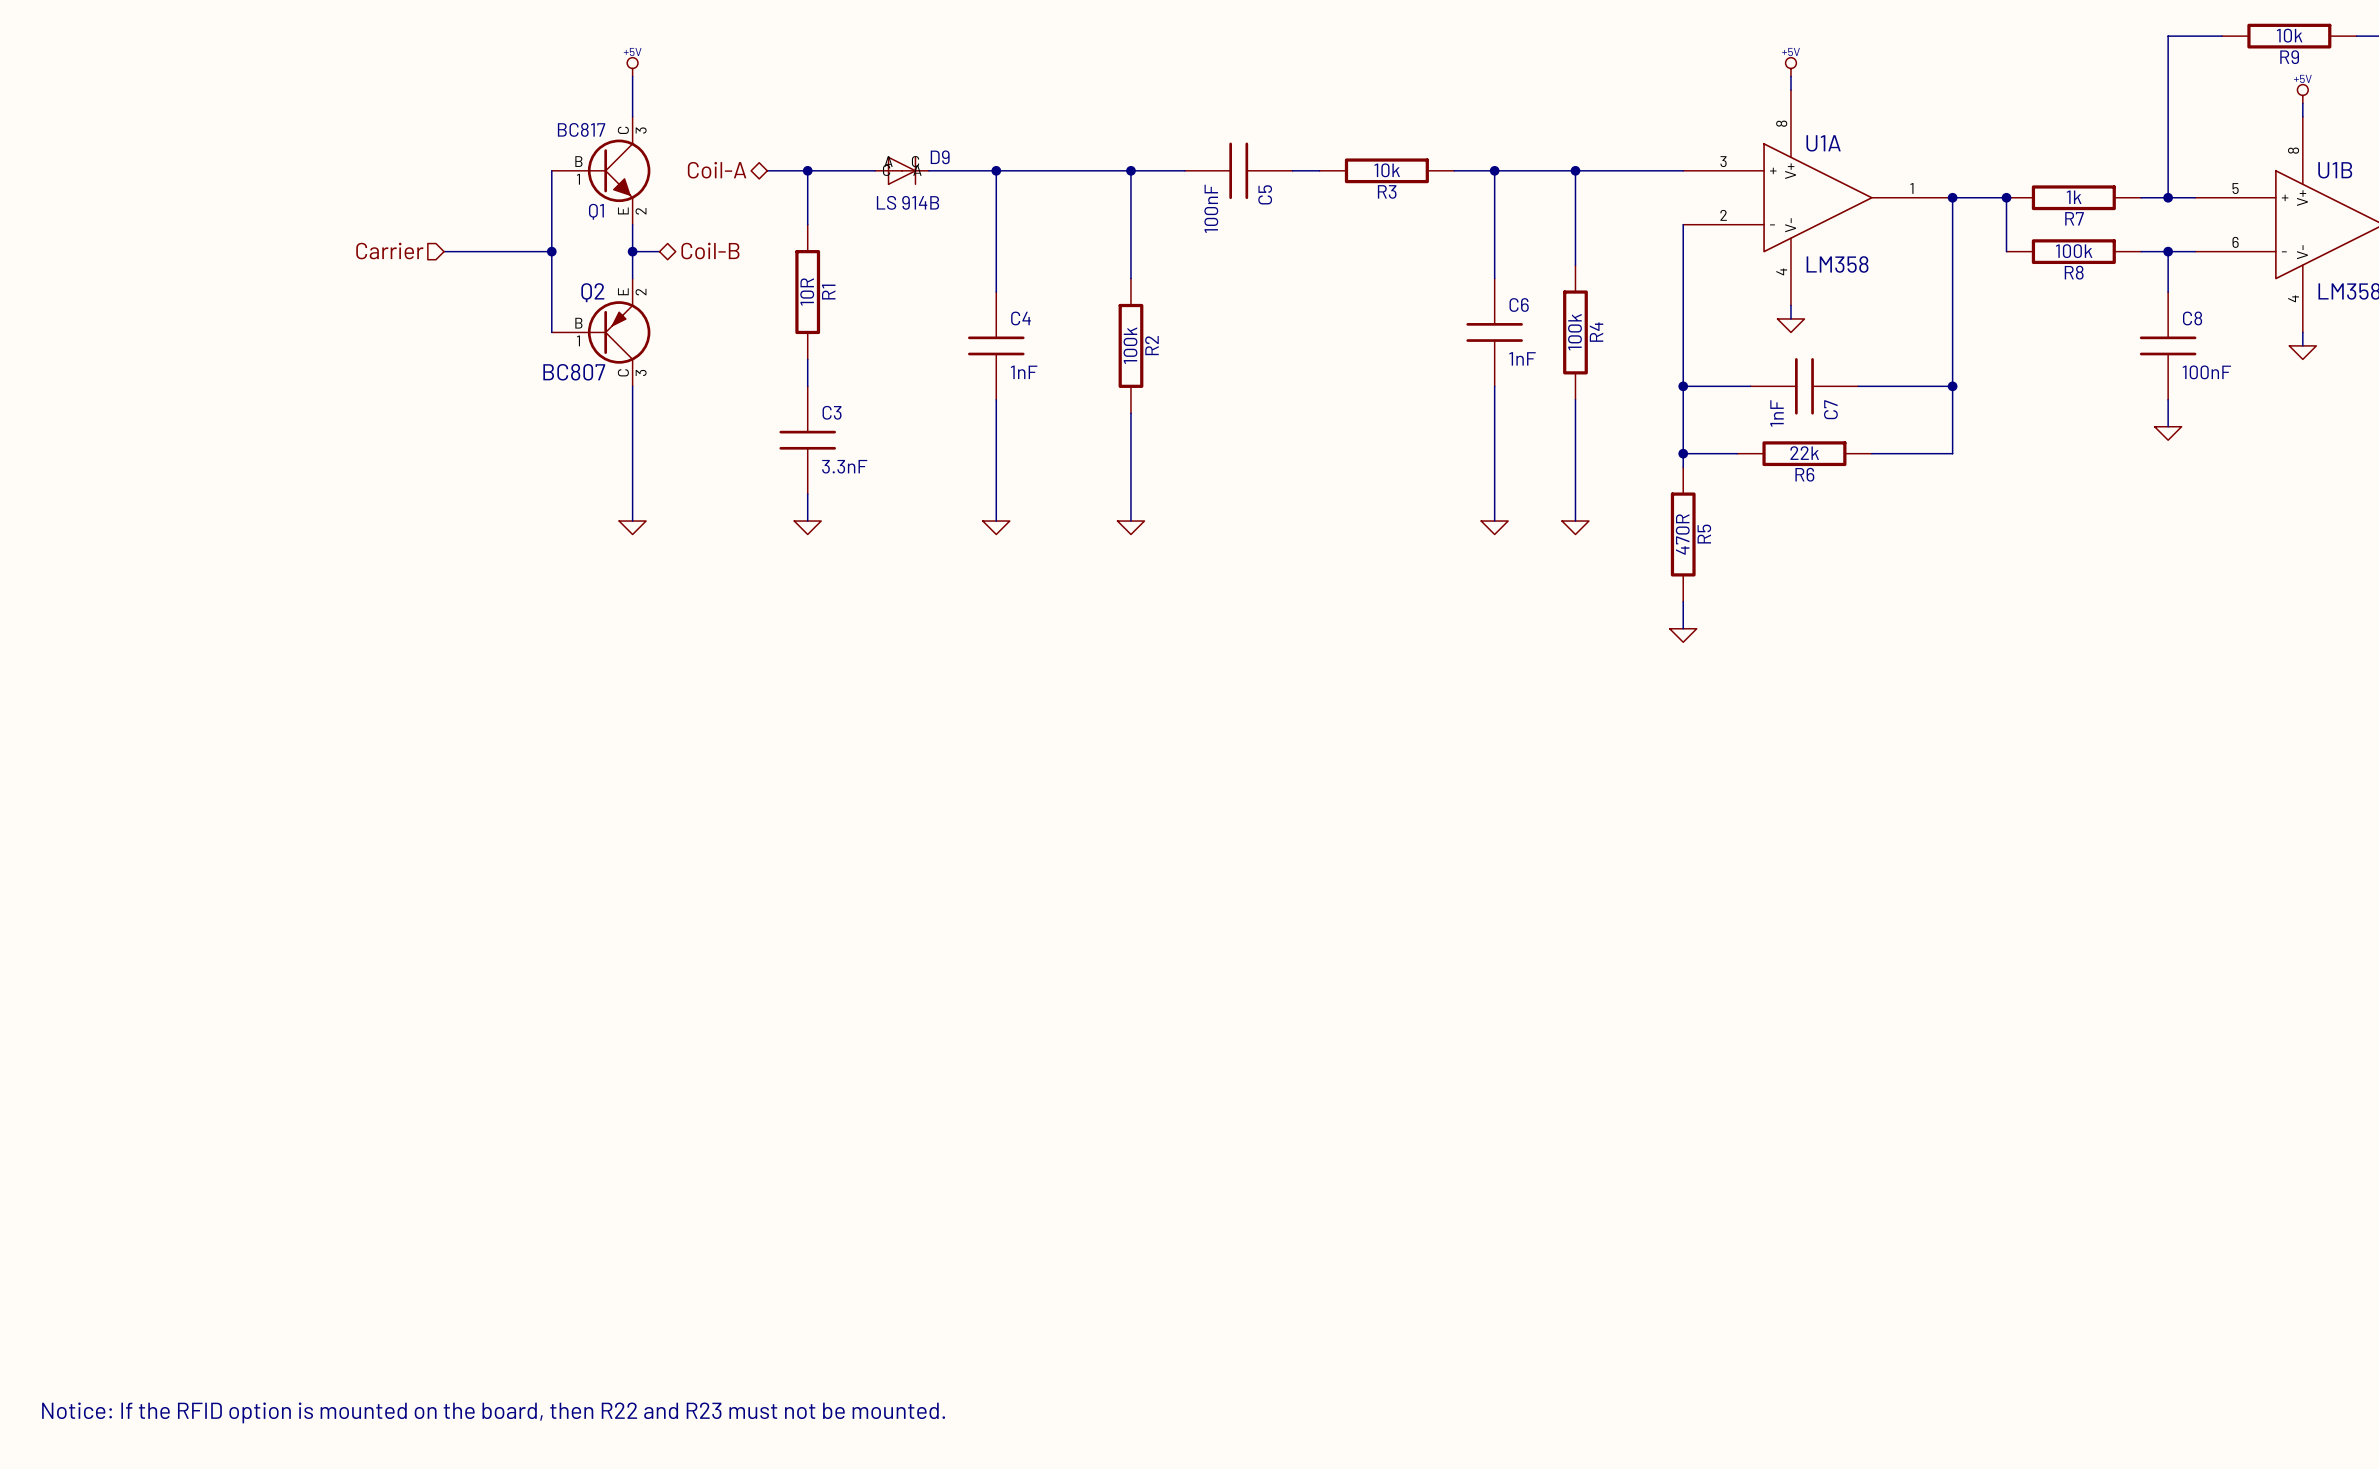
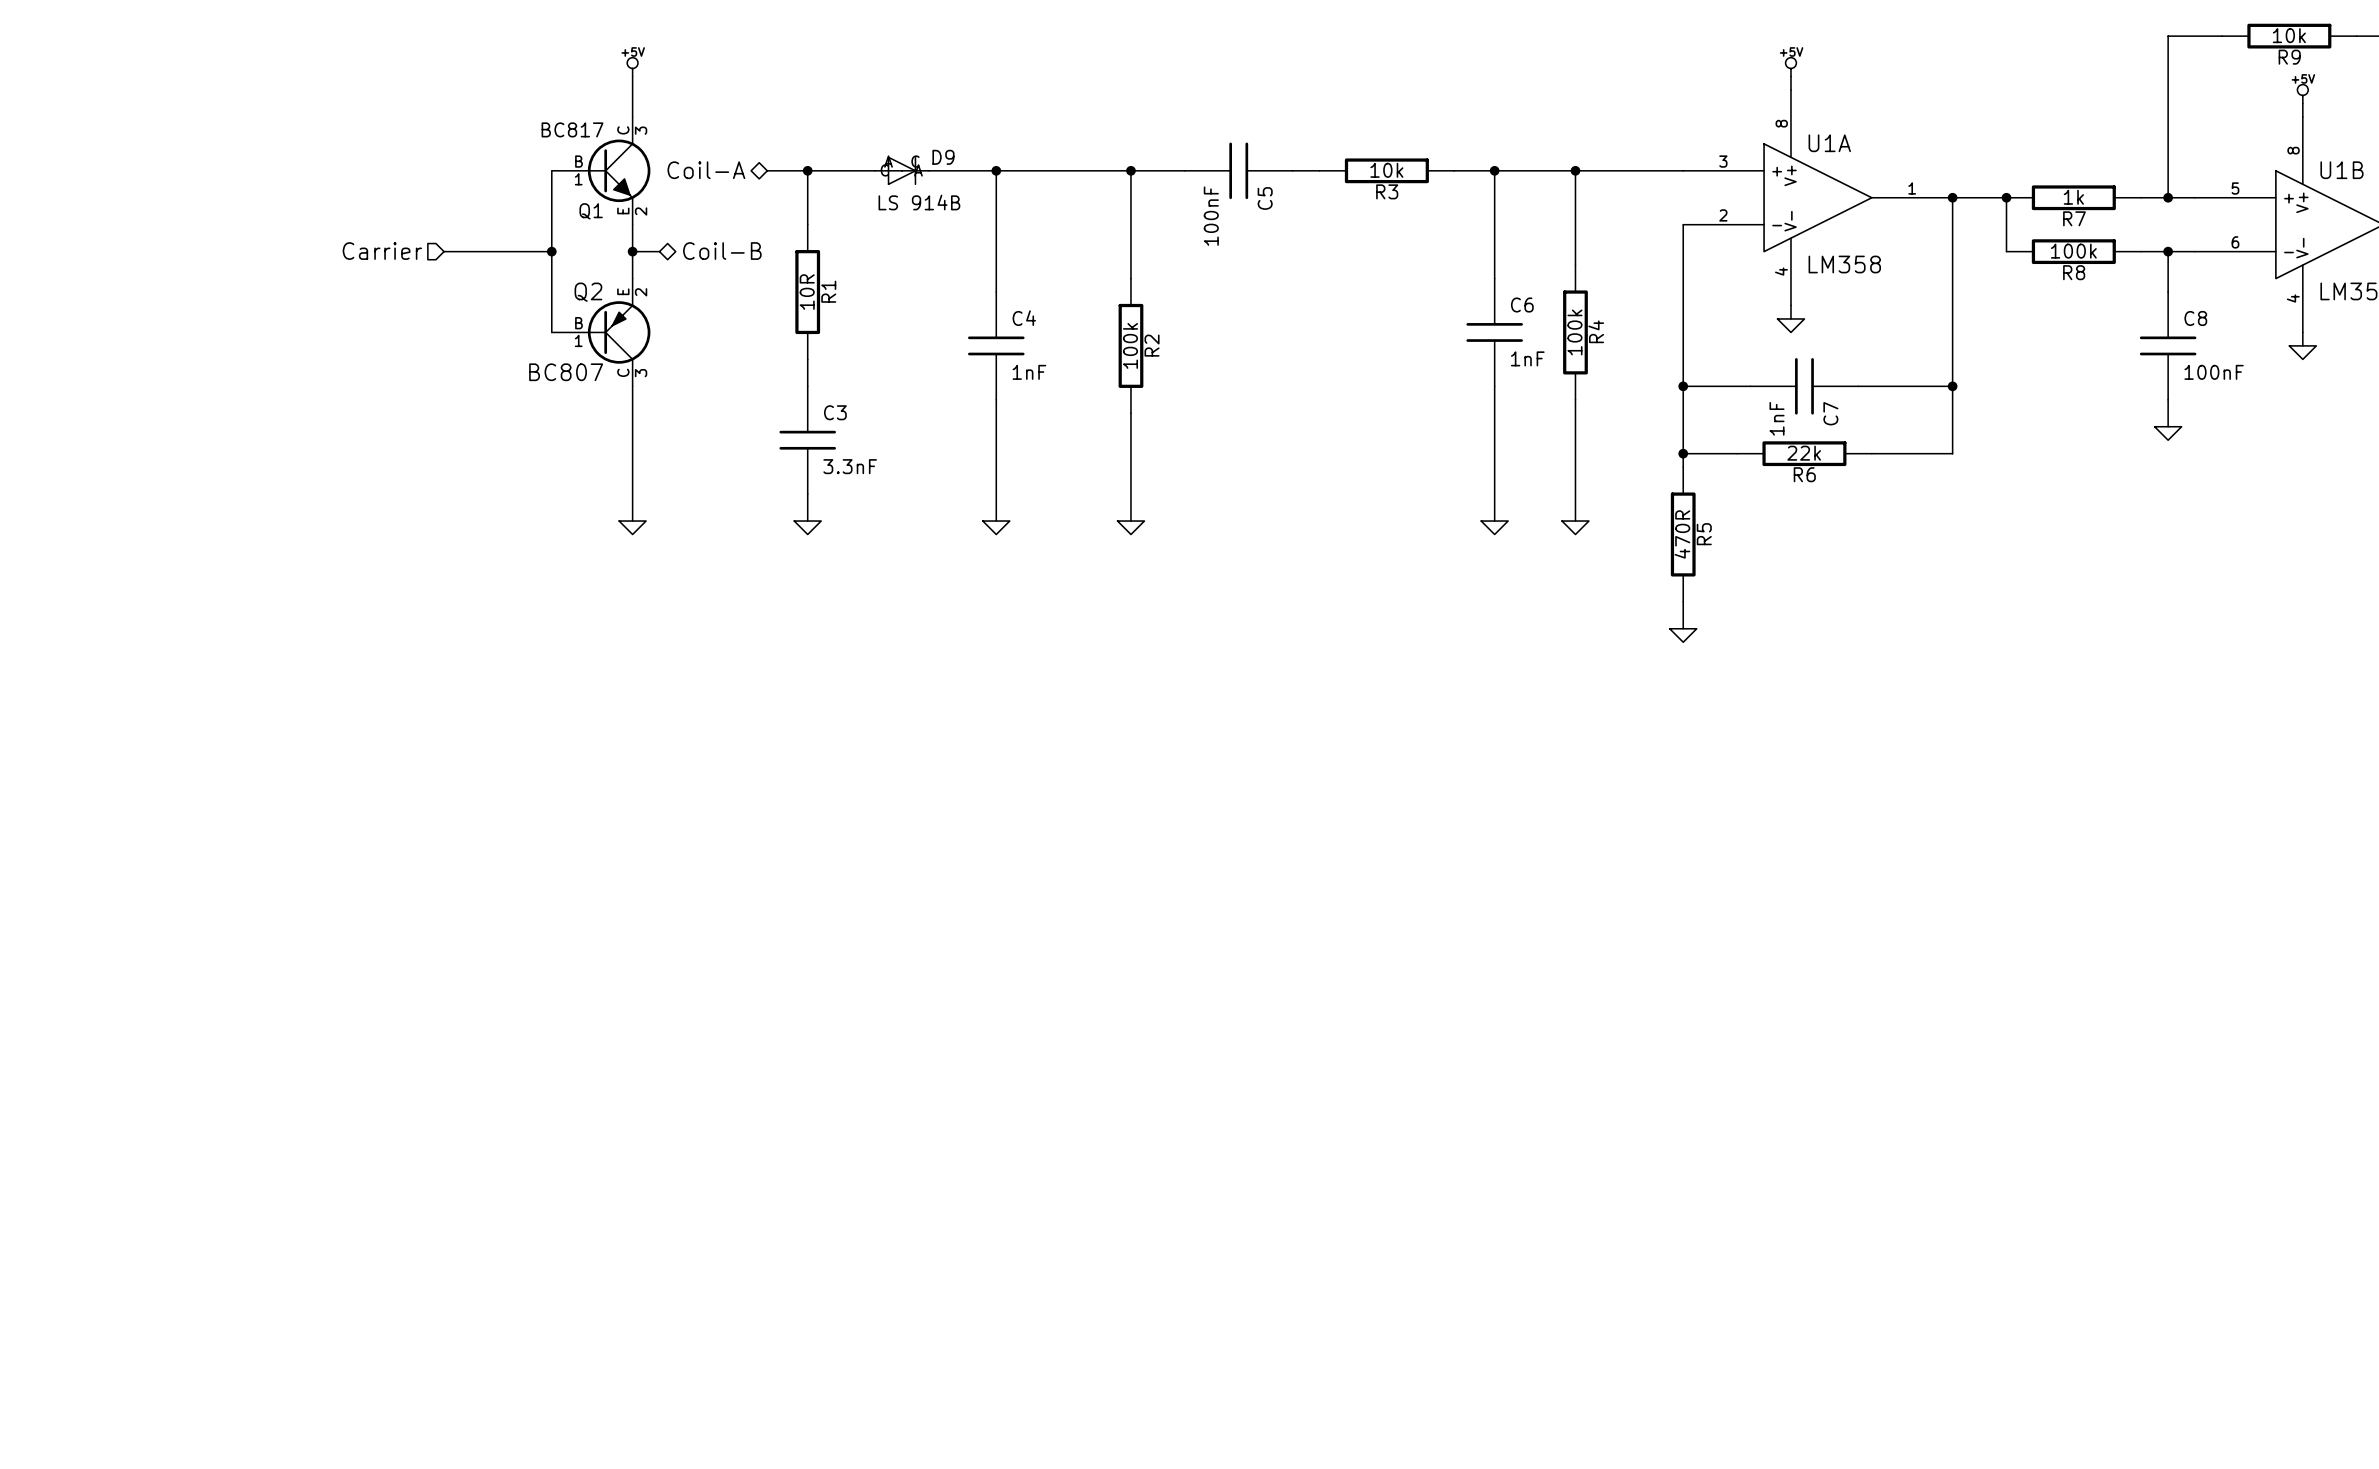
text: Notice: If the RFID option is mounted on the board, then R22 and R23 must not be mounted. (493, 1412) -> none

